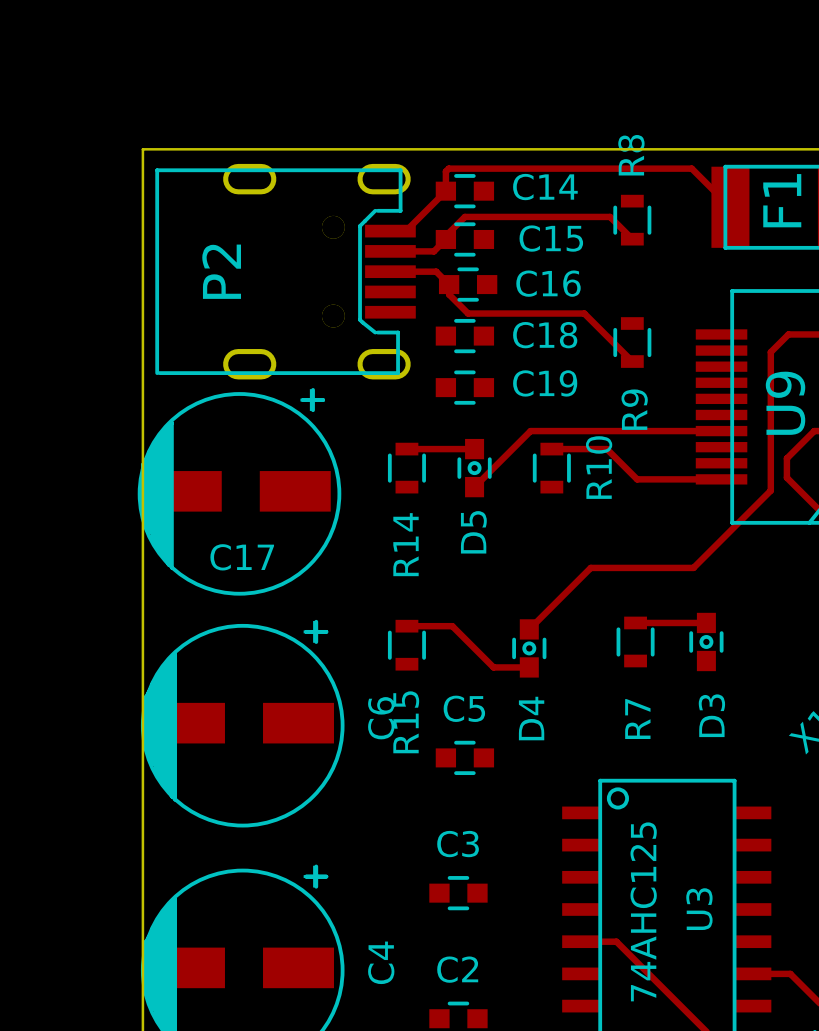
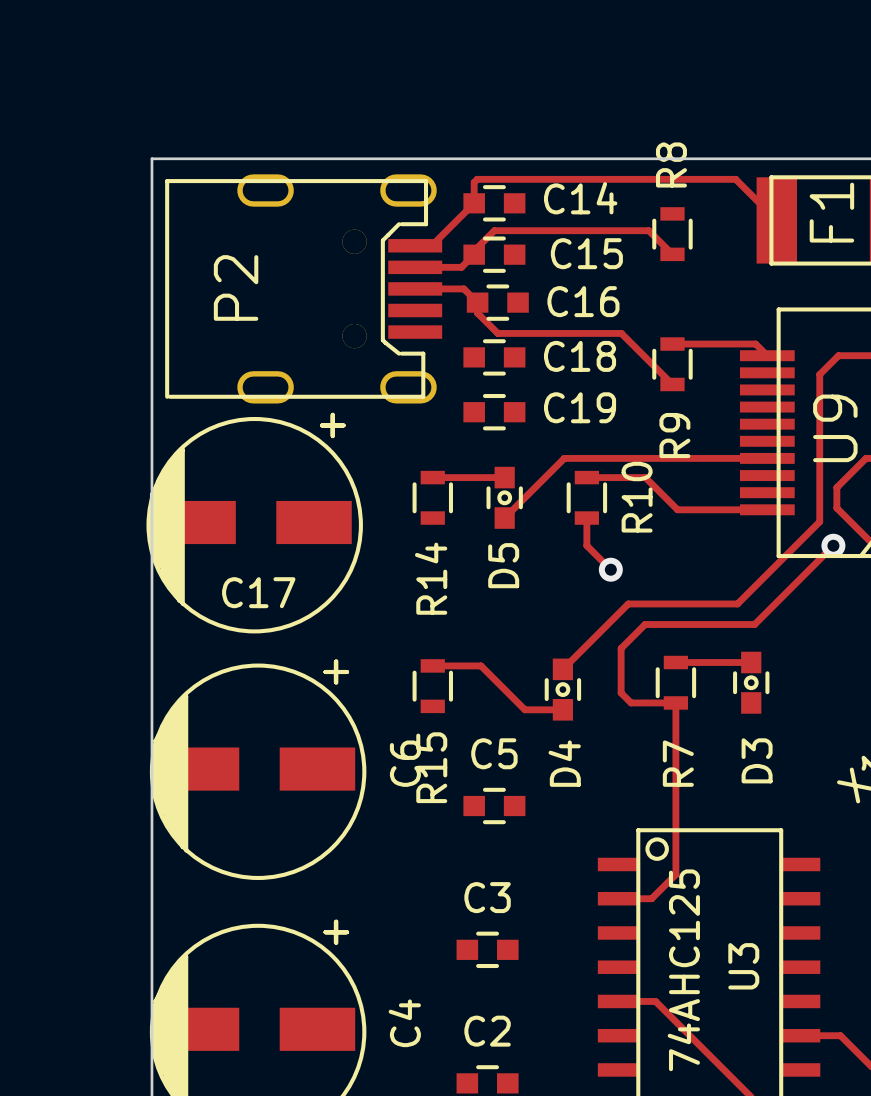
track: none -> (672, 344) (755, 344) (767, 355)
track: none -> (586, 518) (586, 545) (610, 569)
track: none -> (833, 545) (754, 624) (645, 624) (621, 648) (621, 693) (631, 702) (675, 702) (675, 874) (651, 898) (618, 898)
via: none -> (833, 545)
via: none -> (610, 569)

